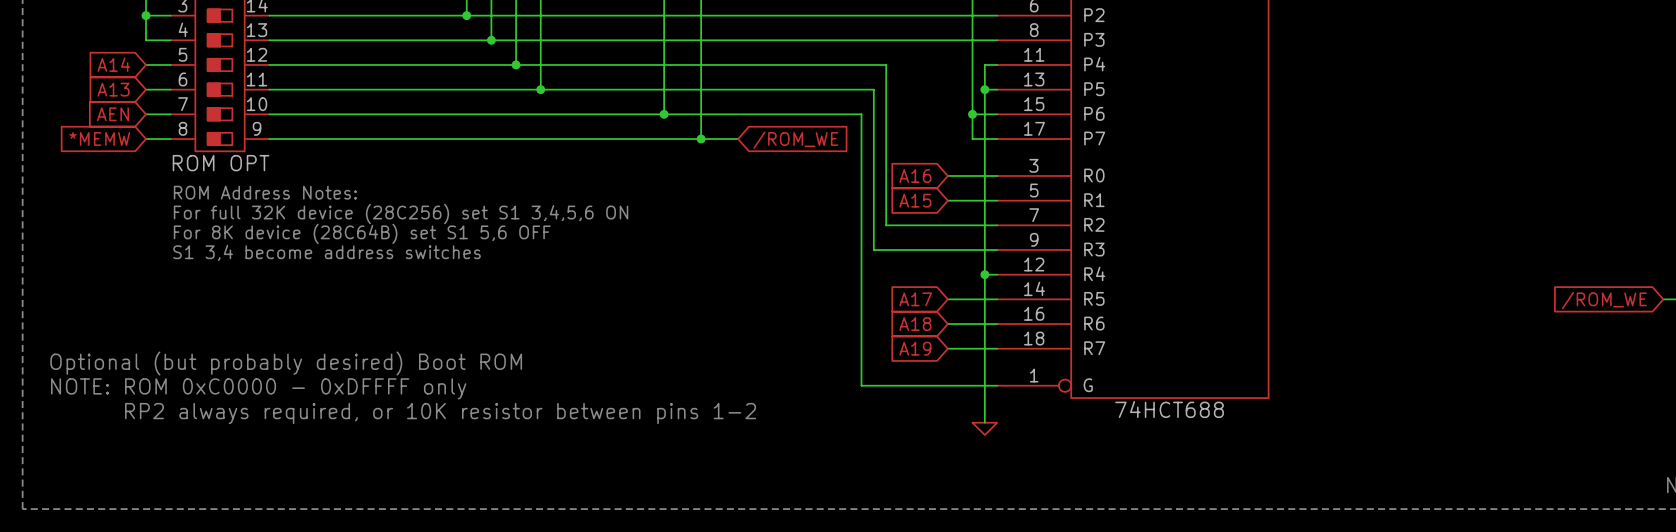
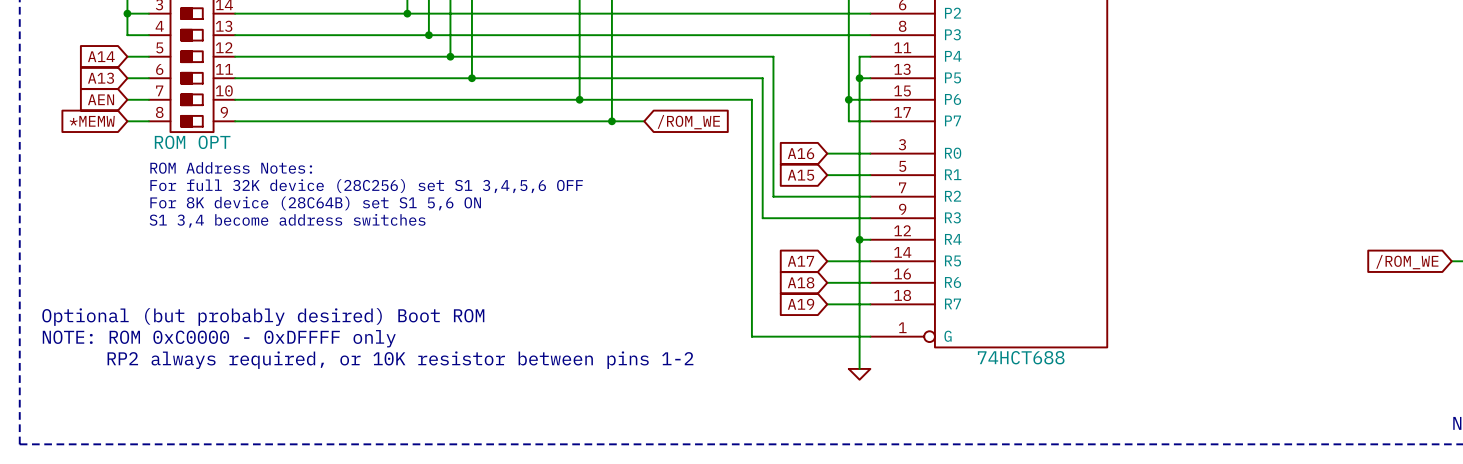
text: For full 32K device (28C256) set S1 3,4,5,6 ON (401, 213) -> For full 32K device (28C256) set S1 3,4,5,6 OFF (366, 186)
text: For 8K device (28C64B) set S1 5,6 OFF (362, 233) -> For 8K device (28C64B) set S1 5,6 ON (315, 203)

